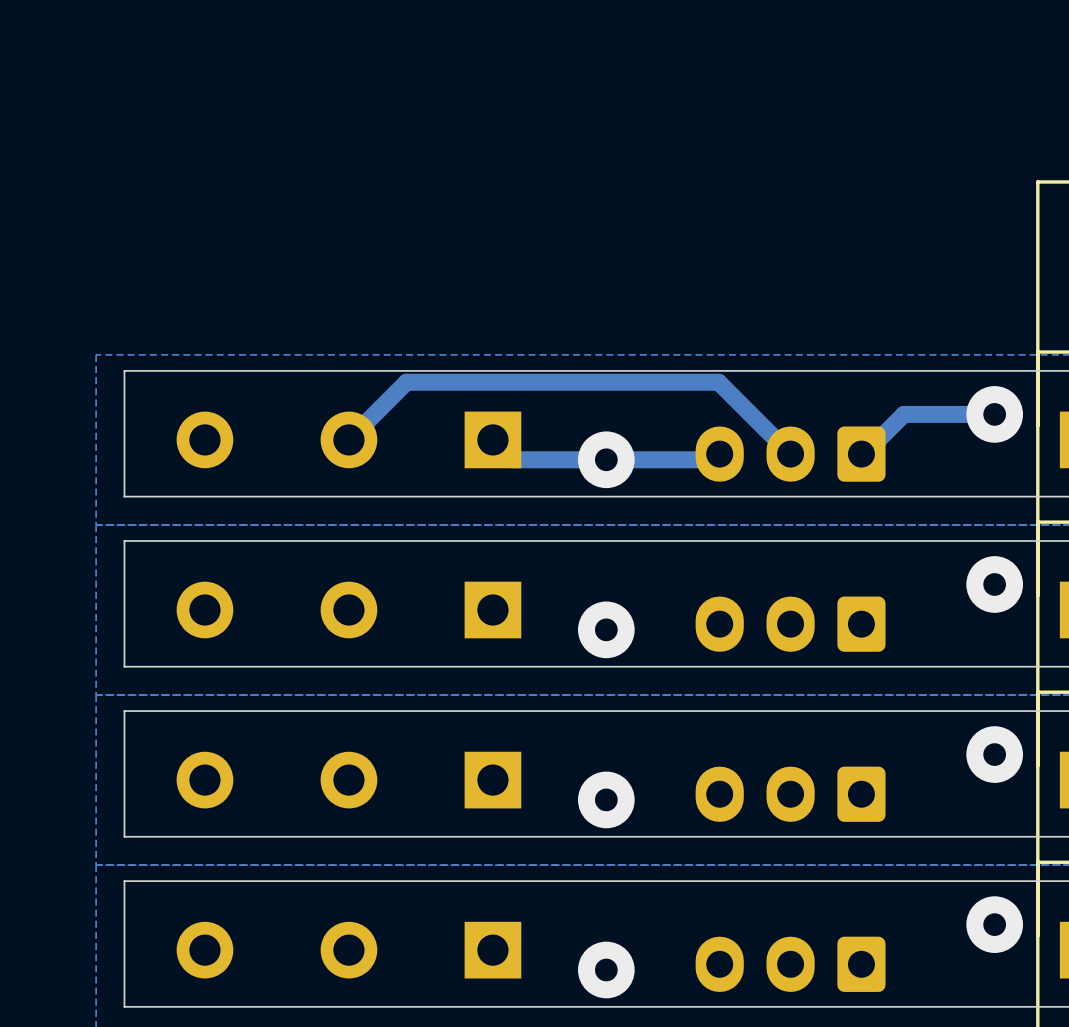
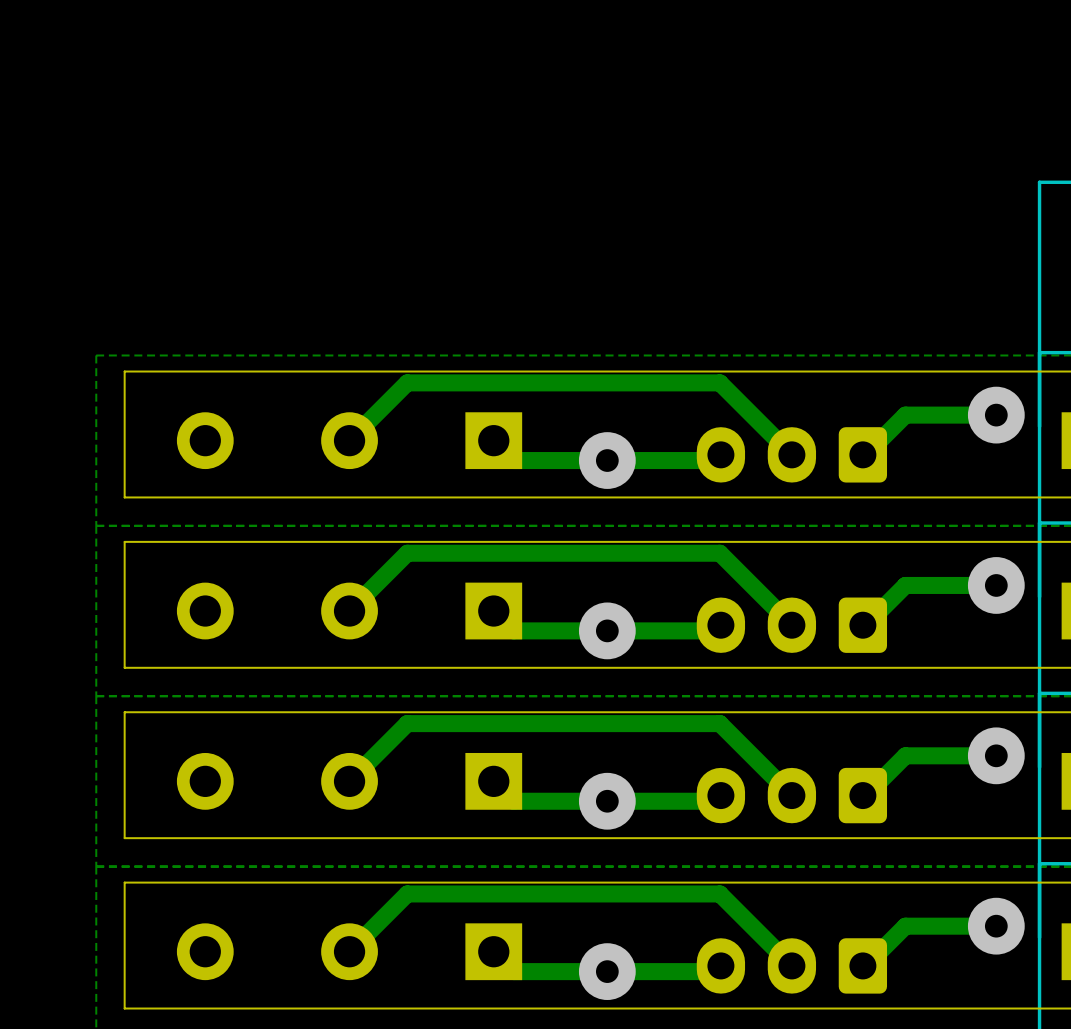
track: none -> (996, 585) (905, 585) (865, 625) (862, 625)
track: none -> (349, 611) (407, 553) (719, 553) (791, 625)
track: none -> (493, 611) (513, 630) (715, 630) (720, 625)
track: none -> (996, 755) (905, 755) (865, 795) (862, 795)
track: none -> (349, 781) (407, 723) (719, 723) (791, 795)
track: none -> (493, 781) (513, 801) (715, 801) (720, 795)
track: none -> (996, 926) (905, 926) (865, 965) (862, 965)
track: none -> (349, 951) (407, 893) (719, 893) (791, 965)
track: none -> (493, 951) (513, 971) (715, 971) (720, 965)

